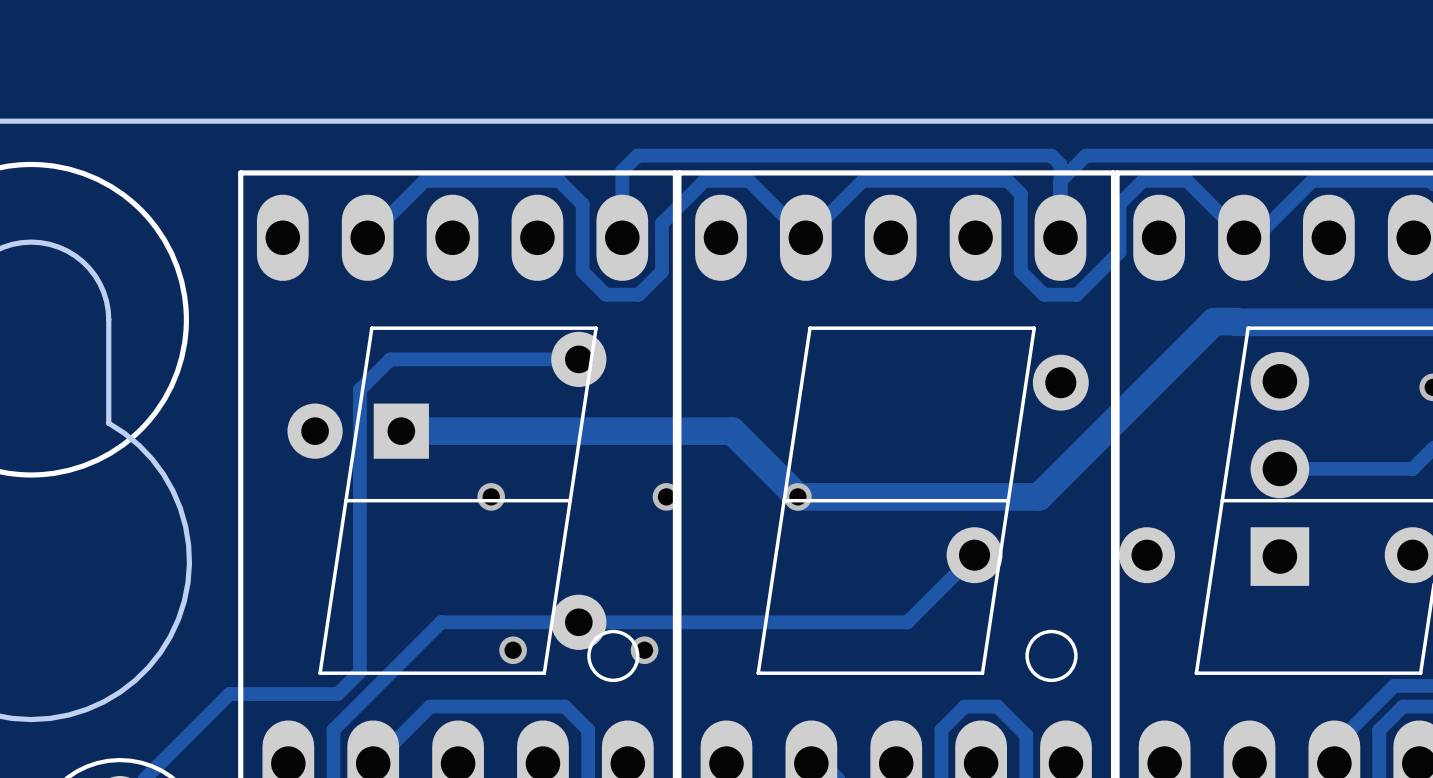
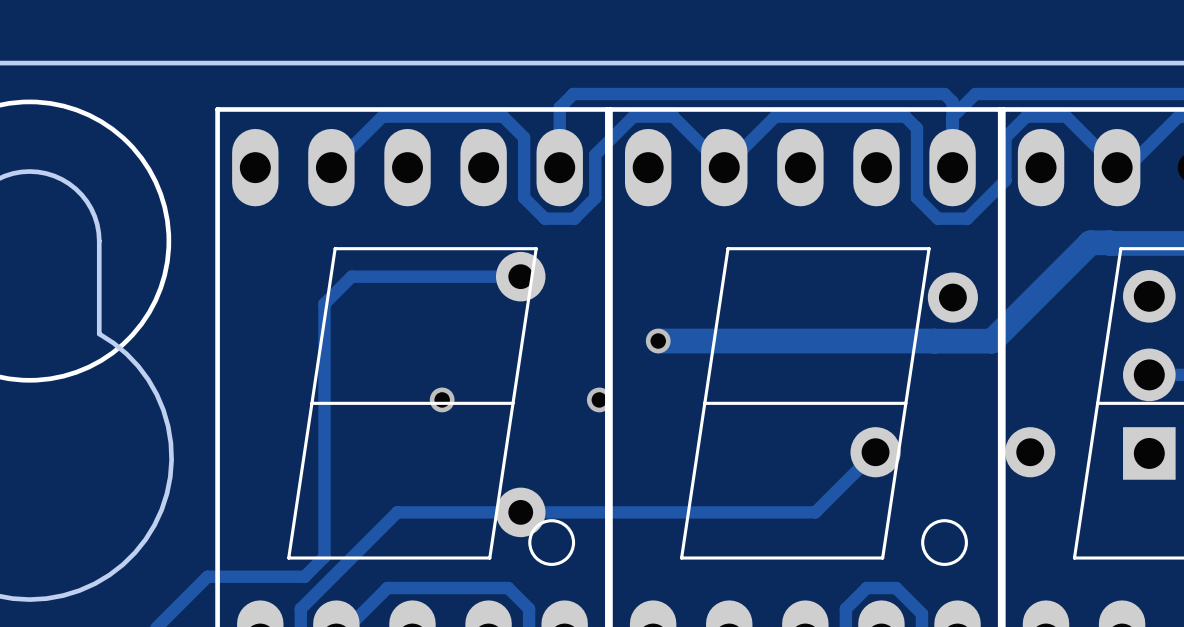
part: (358, 431) -> none
track: (401, 431) (732, 431) (797, 496) (1038, 496) (1104, 431) -> (934, 341) (992, 341)
track: none -> (658, 341) (934, 341)
via position: (797, 496) -> (658, 341)
via: (513, 650) -> none
via: (644, 650) -> none

